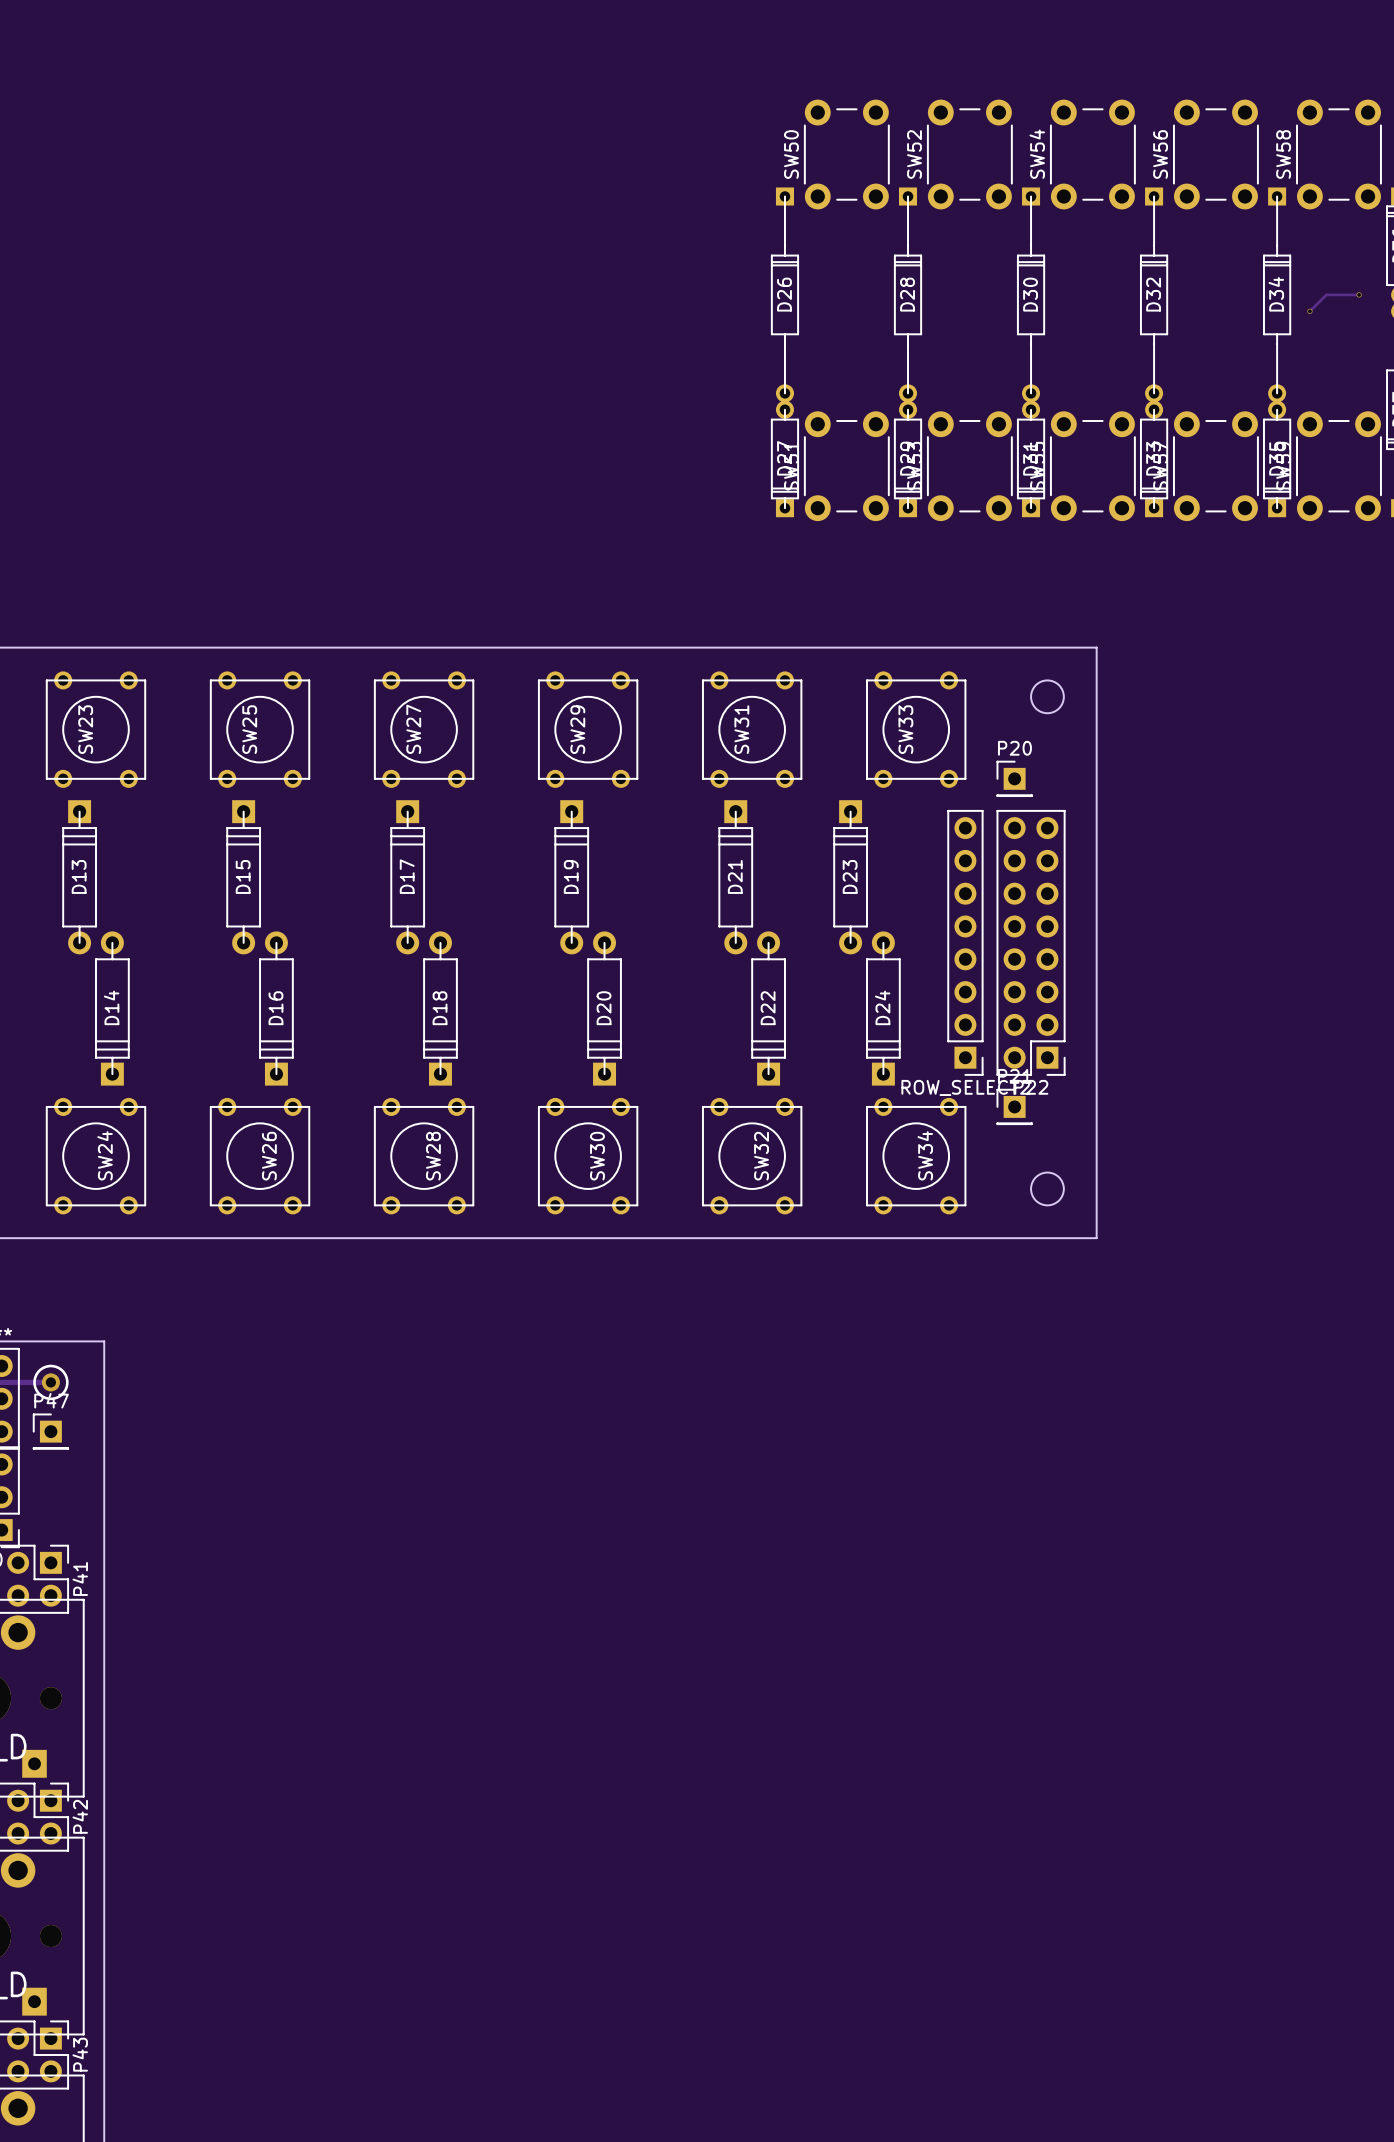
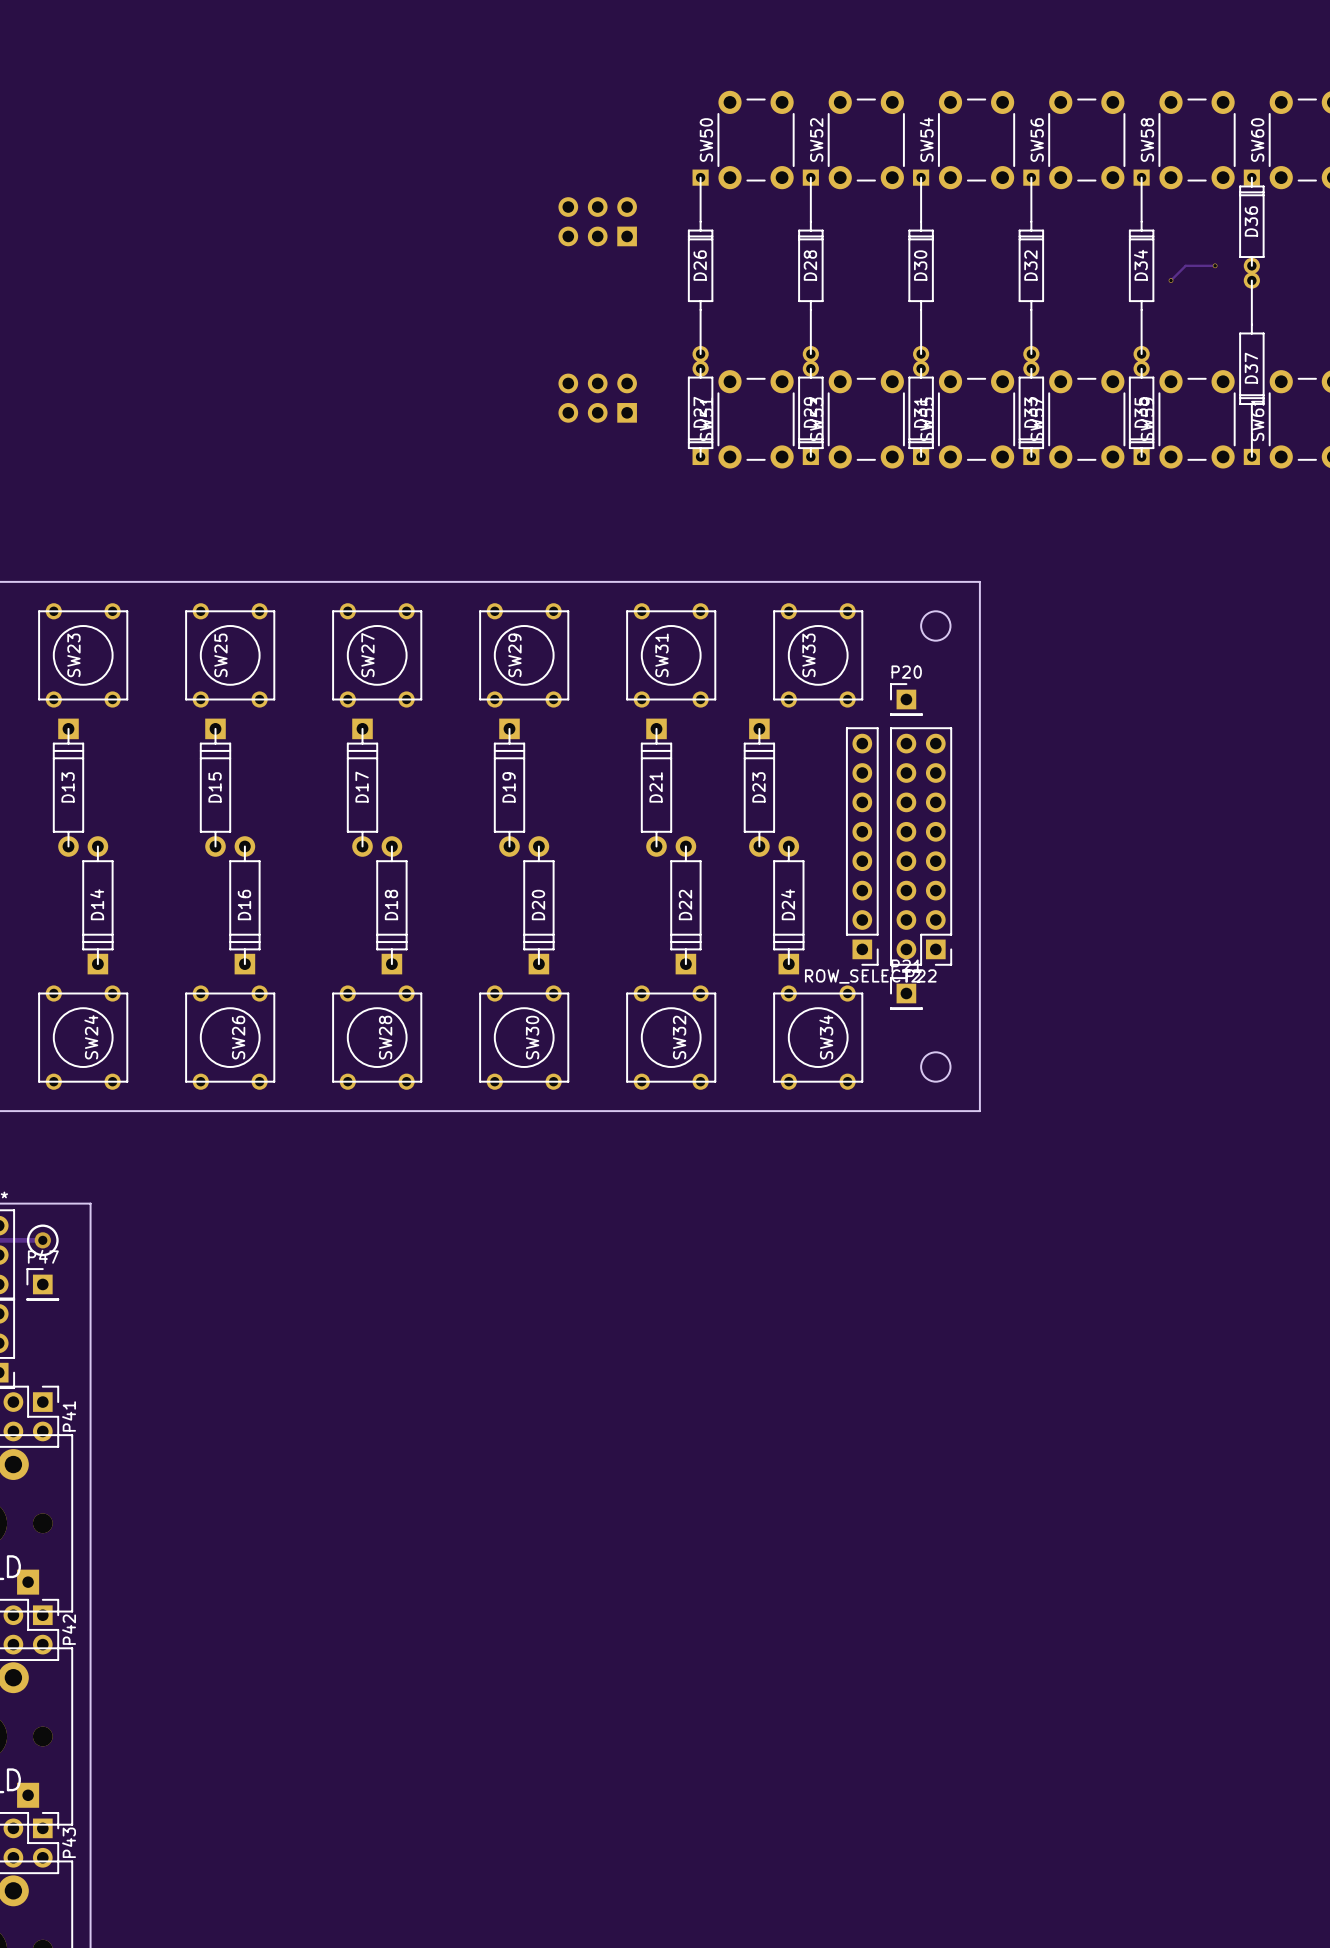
part: none -> (597, 221)
part: none -> (597, 398)

